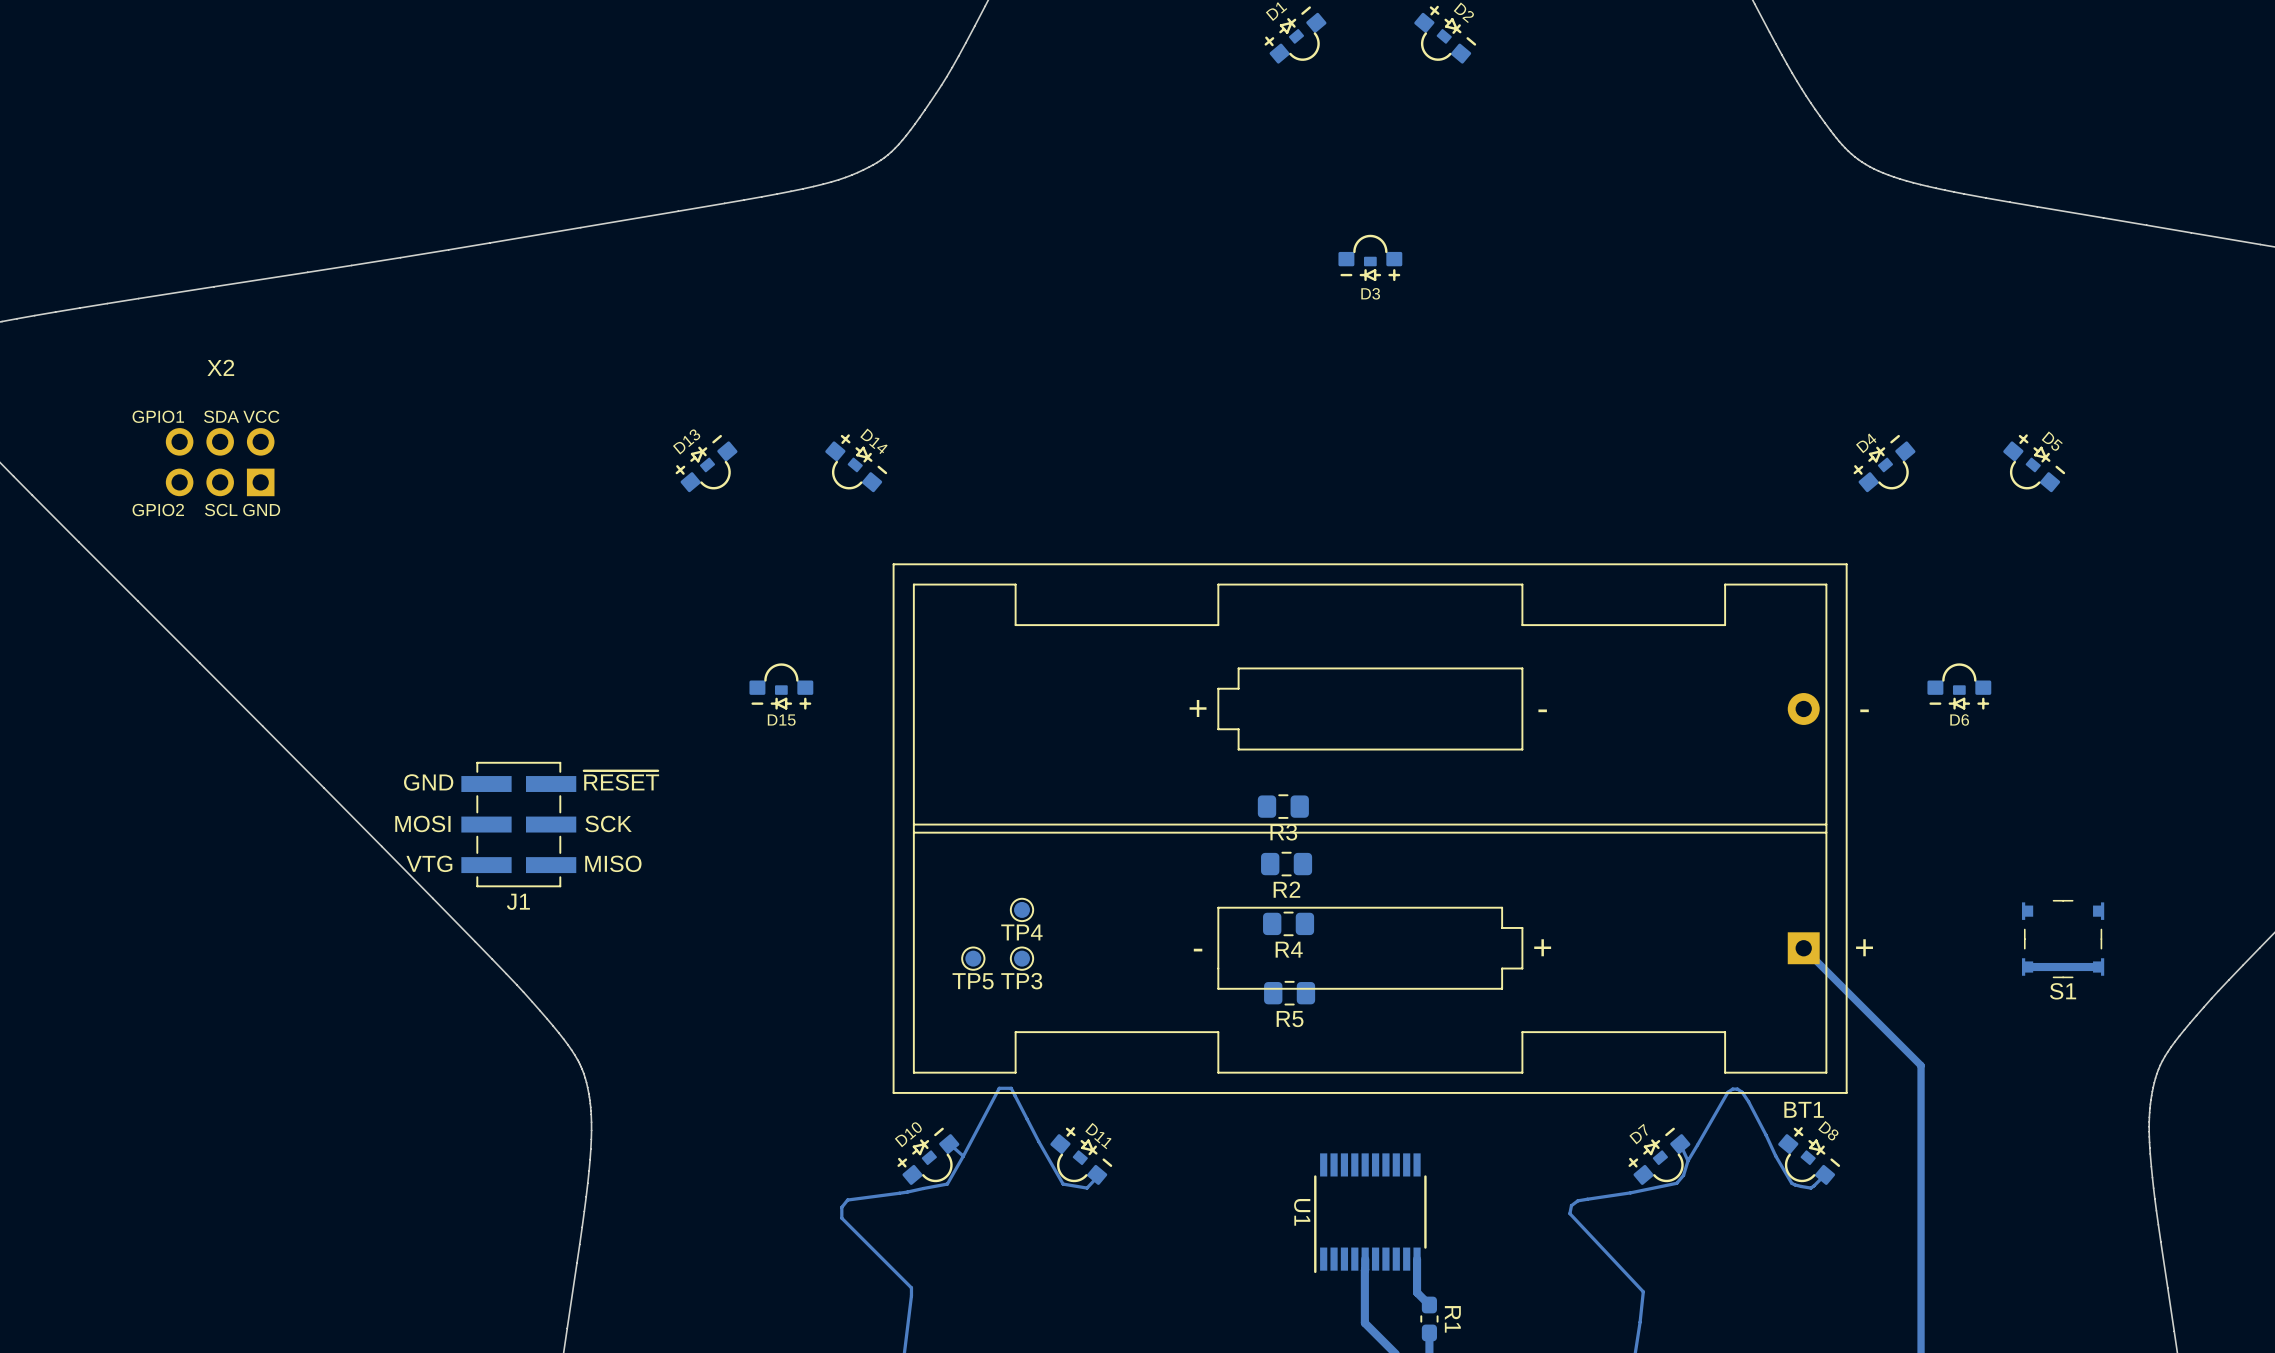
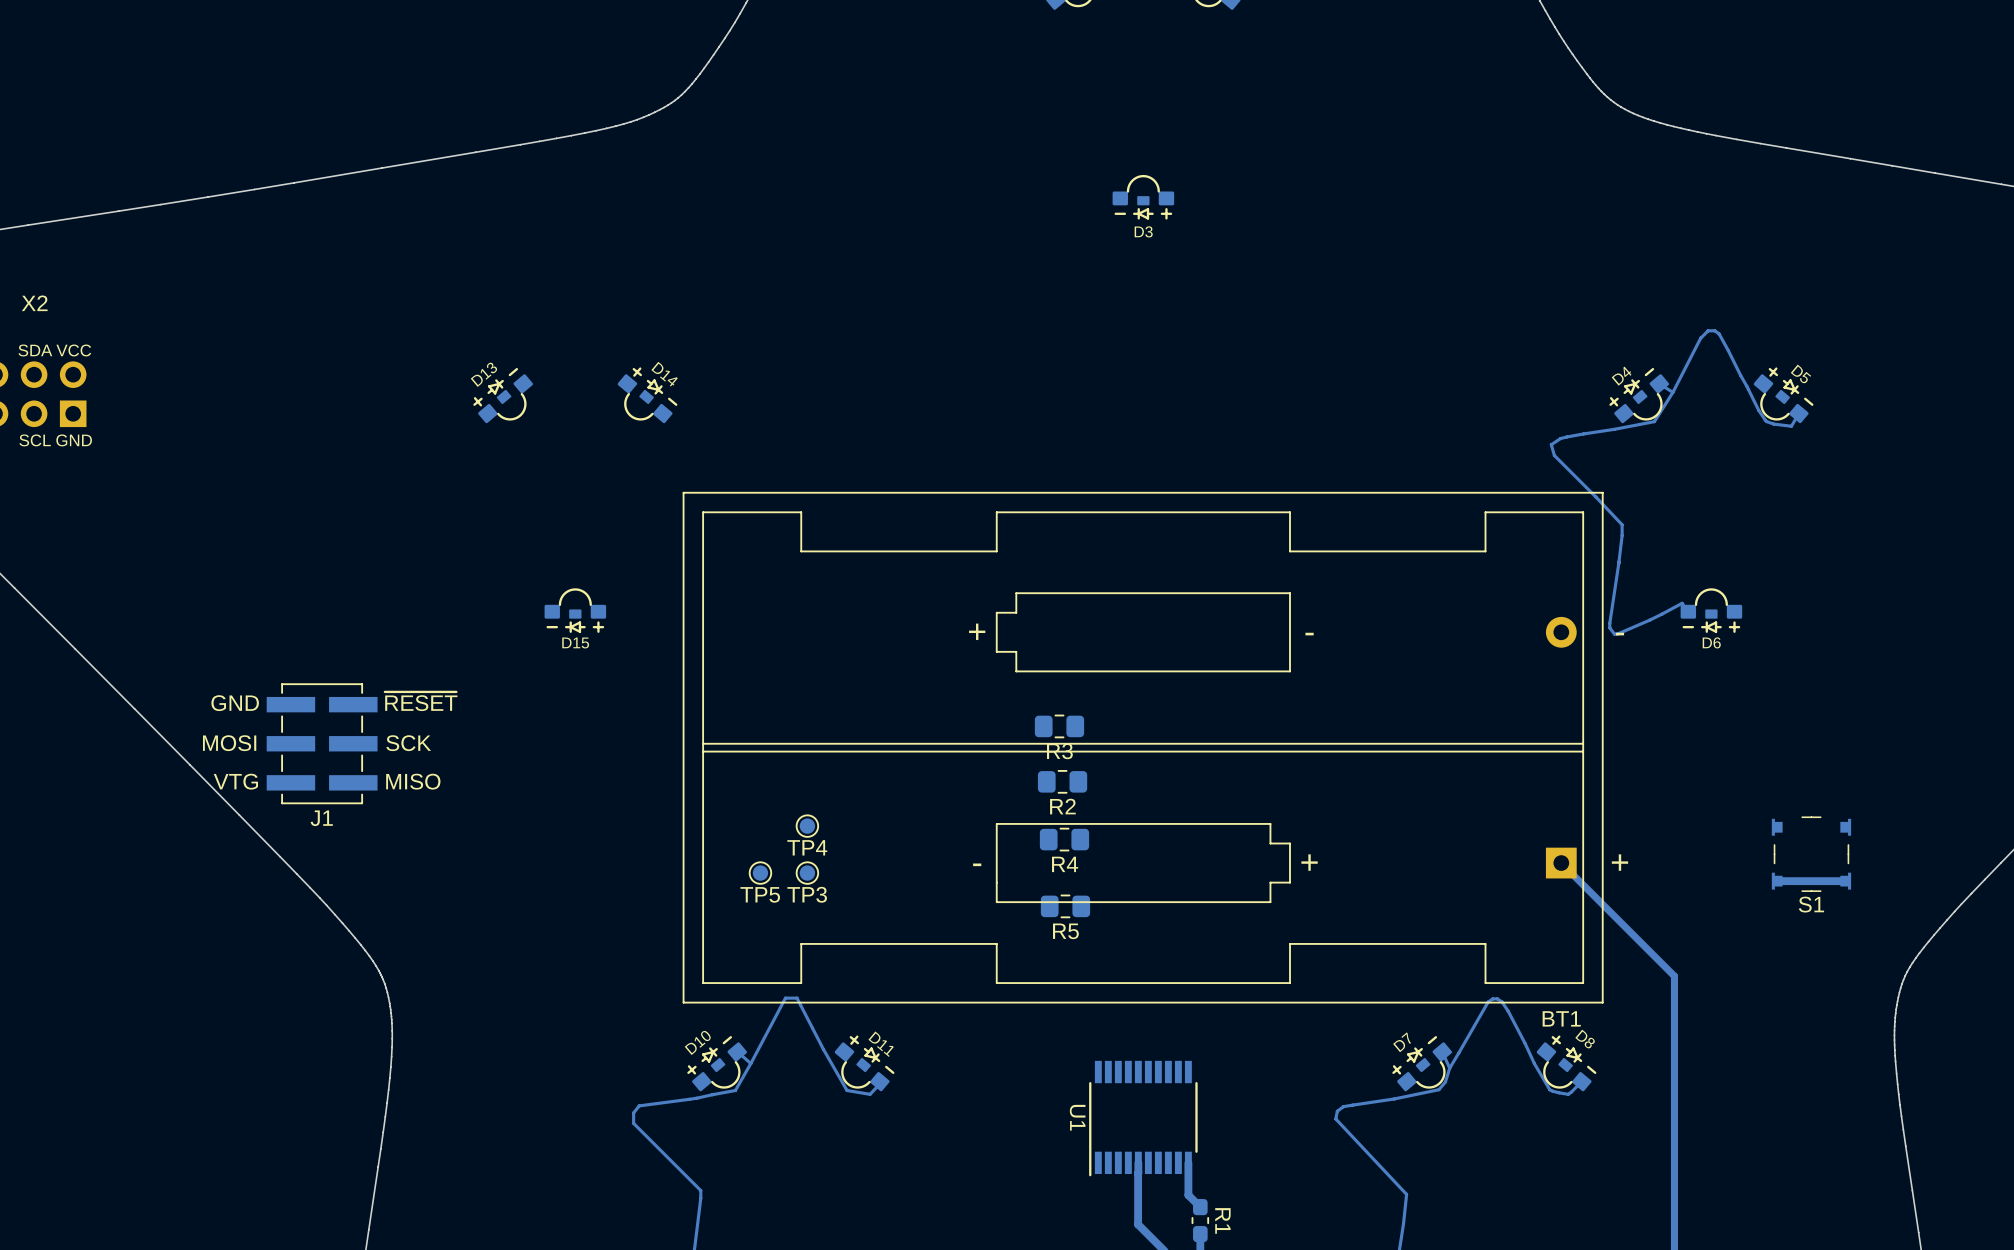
bottom track: none -> (1659, 383) (1672, 392)
bottom track: none -> (1672, 392) (1654, 421) (1566, 437) (1551, 444) (1554, 455) (1622, 524) (1618, 563)
bottom track: none -> (1672, 392) (1700, 338) (1708, 330) (1714, 330) (1719, 333) (1758, 410) (1766, 421) (1791, 426) (1798, 413)
bottom track: none -> (1619, 561) (1609, 623) (1609, 627) (1614, 634) (1649, 620) (1682, 603) (1688, 611)

